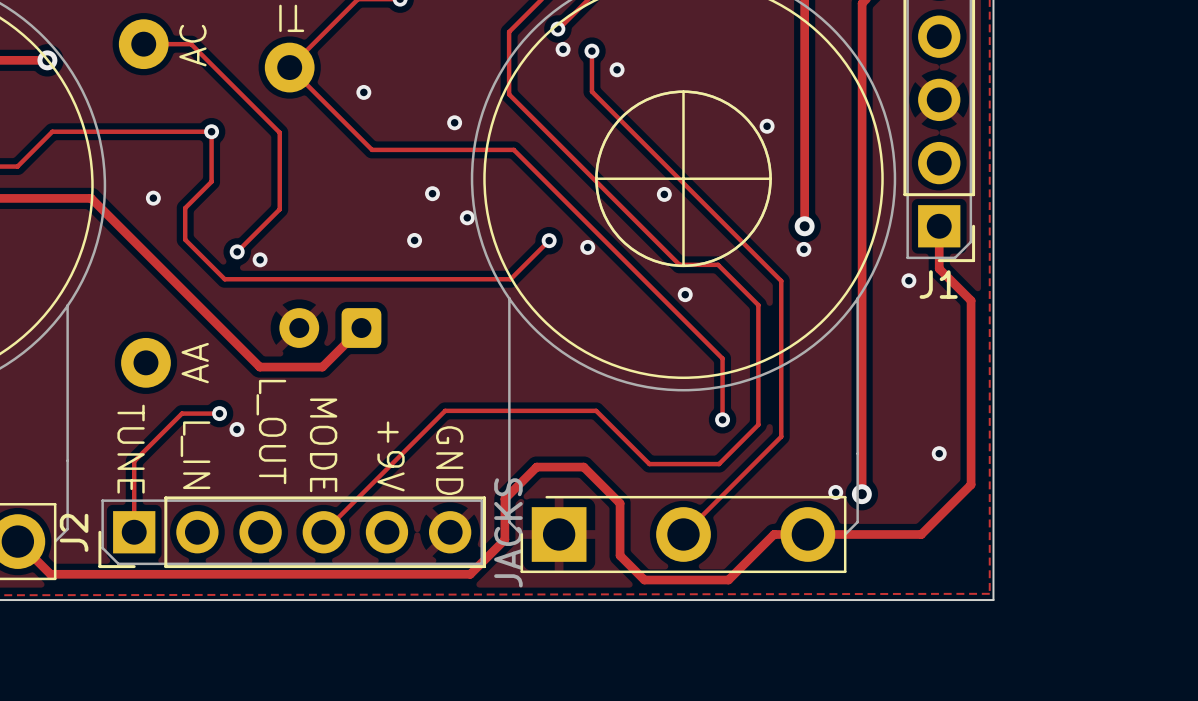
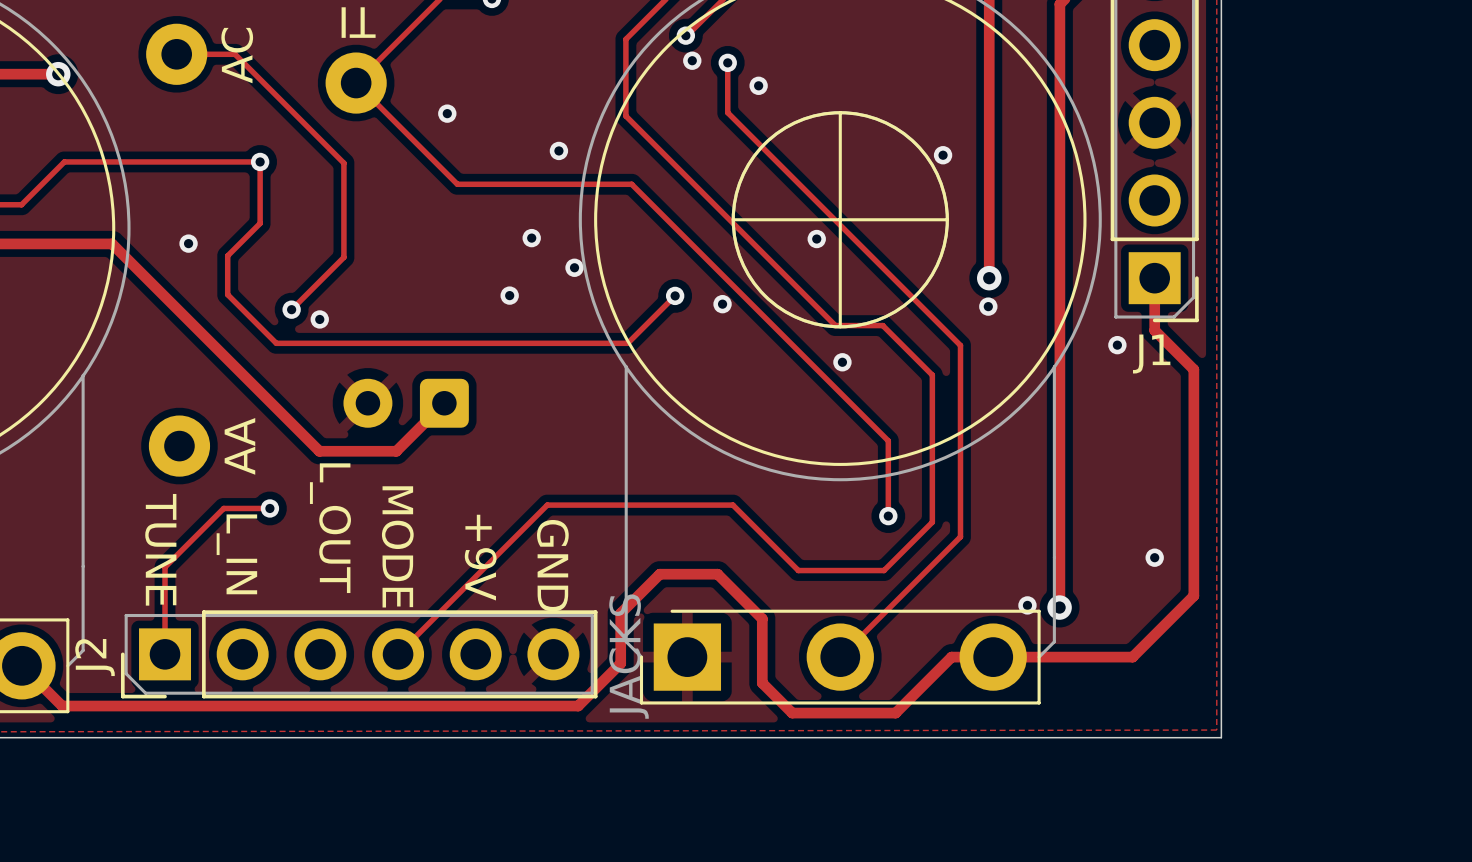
via: (236, 429) -> none

